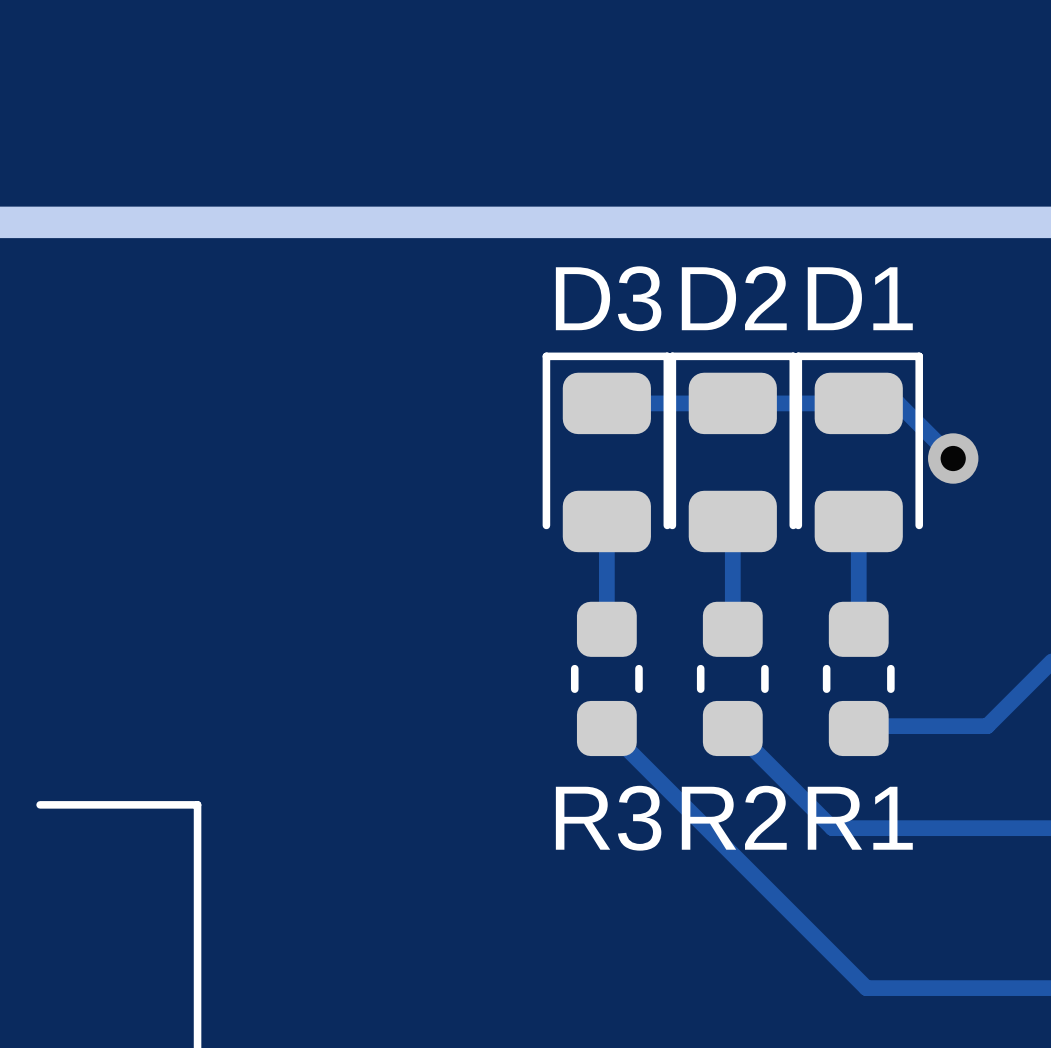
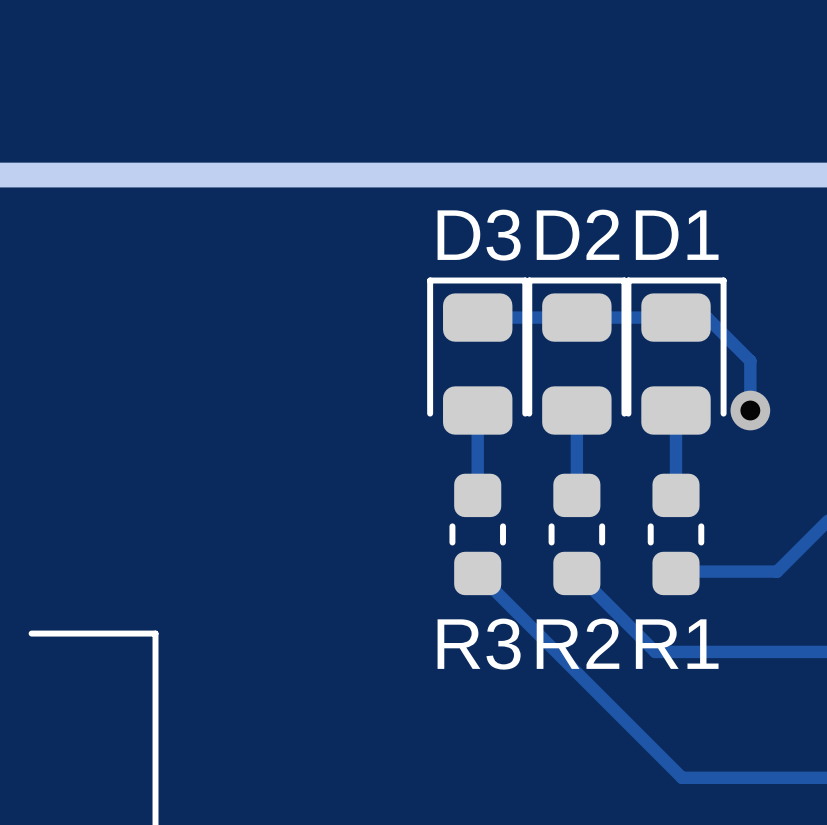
track: none -> (750, 360) (750, 410)
via position: (953, 458) -> (750, 410)

